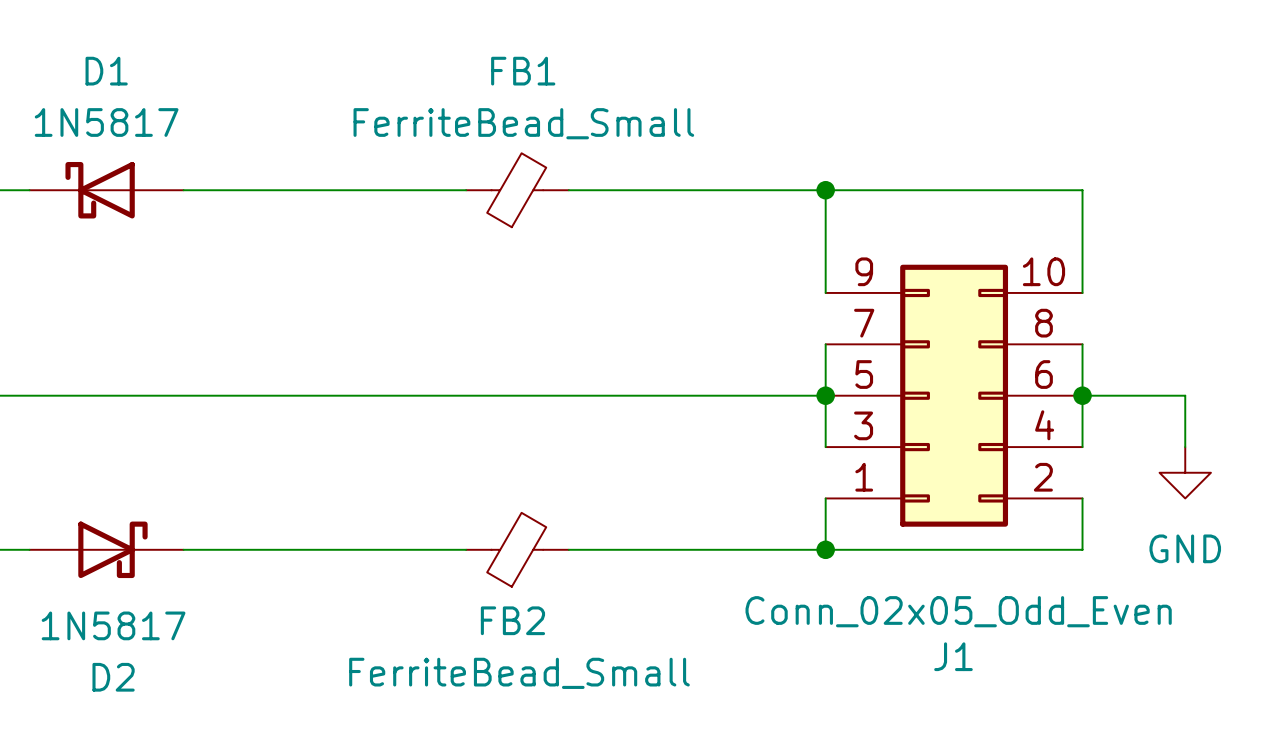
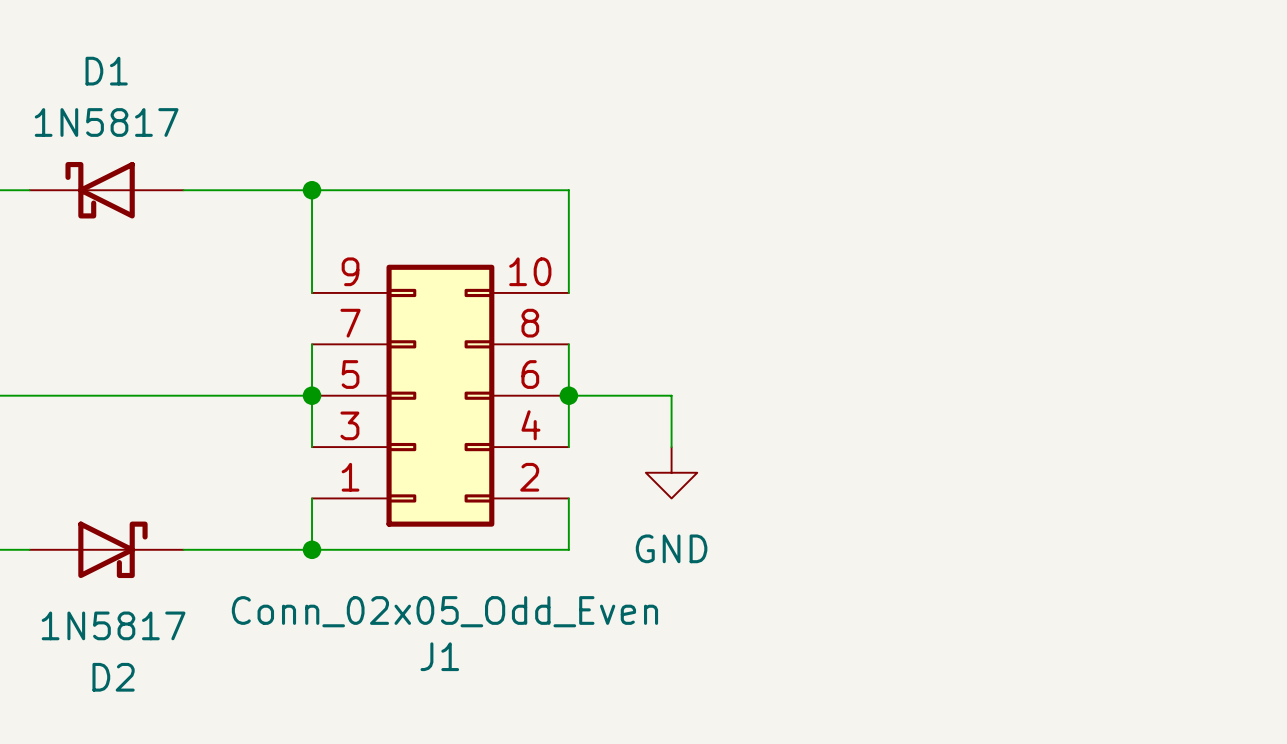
wire: none -> (312, 190) (312, 292)
junction: none -> (312, 190)
wire: none -> (466, 190) (568, 190) (568, 292)
FB1: FerriteBead_Small (517, 190) -> none
wire: (568, 190) (1082, 190) (1082, 292) -> none
wire: (825, 190) (825, 292) -> none
junction: (825, 190) -> none
wire: none -> (312, 344) (312, 447)
wire: (825, 344) (825, 447) -> (568, 344) (568, 447)
wire: (1082, 344) (1082, 447) -> none
junction: none -> (312, 395)
junction: none -> (568, 395)
wire: (671, 395) (825, 395) -> (671, 395) (671, 447)
junction: (825, 395) -> none
J1 position: (954, 395) -> (440, 395)
wire: (1082, 395) (1185, 395) (1185, 447) -> none
junction: (1082, 395) -> none
power symbol: none -> GND (671, 472)
power symbol: GND (1185, 472) -> none
wire: none -> (312, 498) (312, 549)
wire: none -> (568, 498) (568, 549) (466, 549)
wire: (825, 498) (825, 549) -> none
wire: (1082, 498) (1082, 549) (568, 549) -> none
junction: none -> (312, 549)
FB2: FerriteBead_Small (517, 549) -> none
junction: (825, 549) -> none

